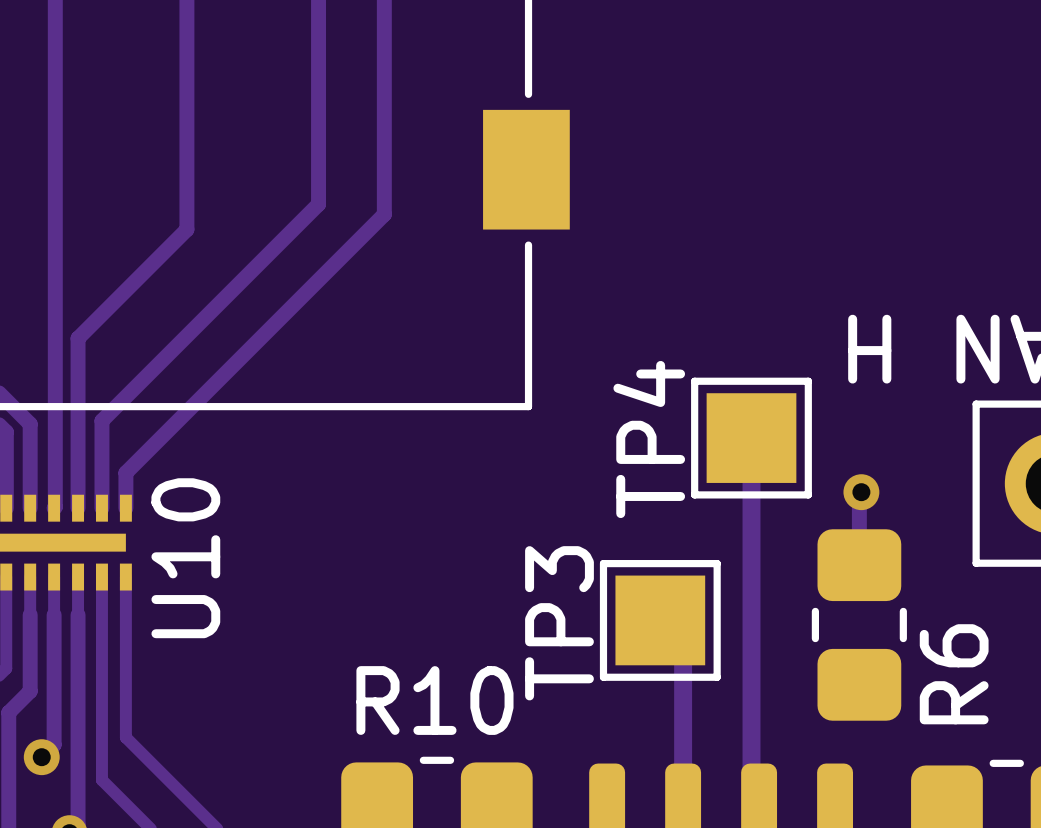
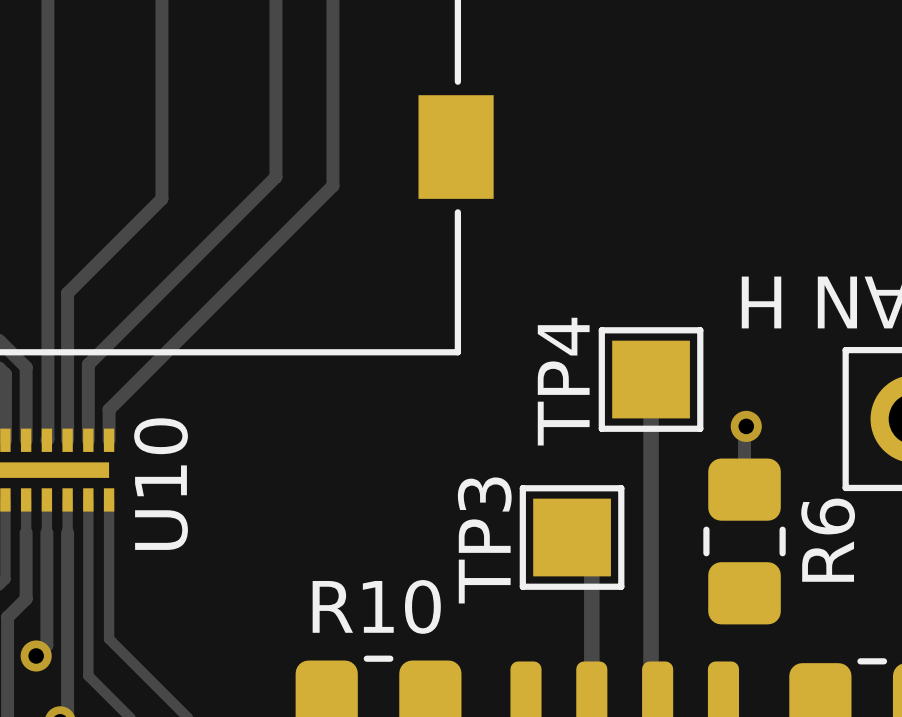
R6 name position: R6 (954, 674) -> R6 (828, 540)

